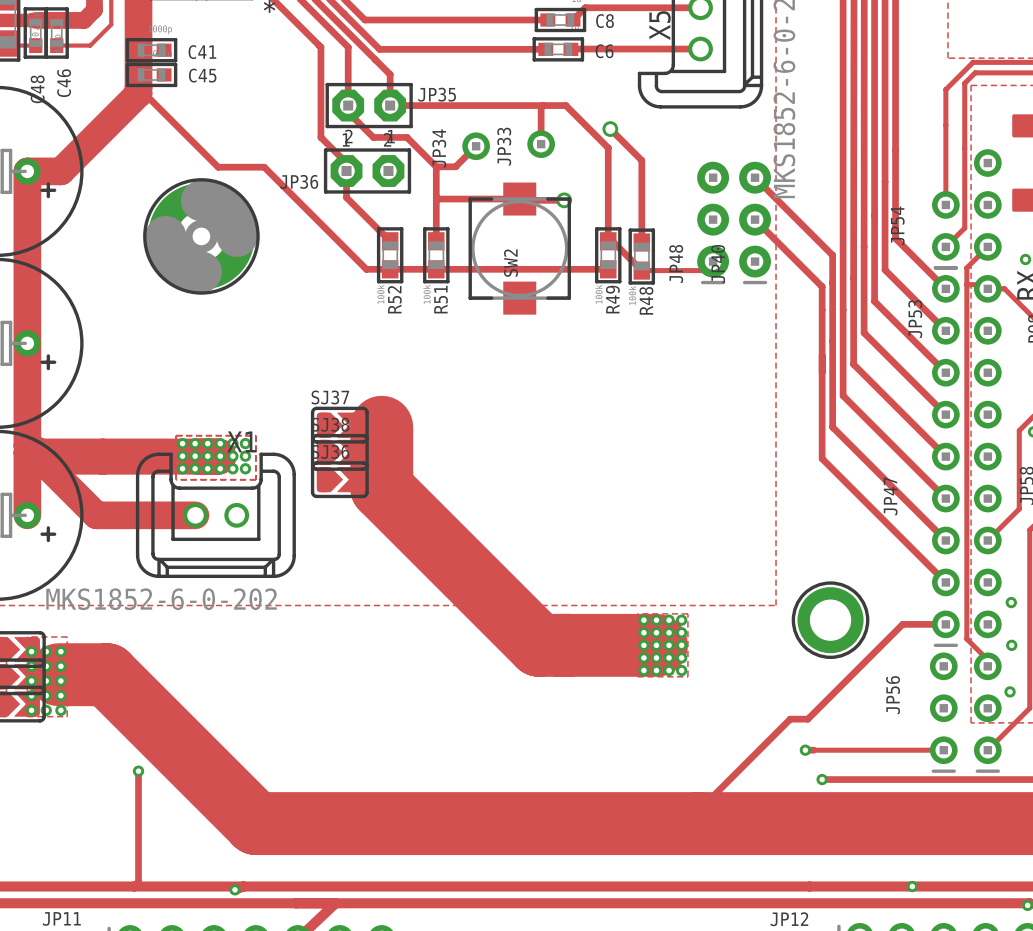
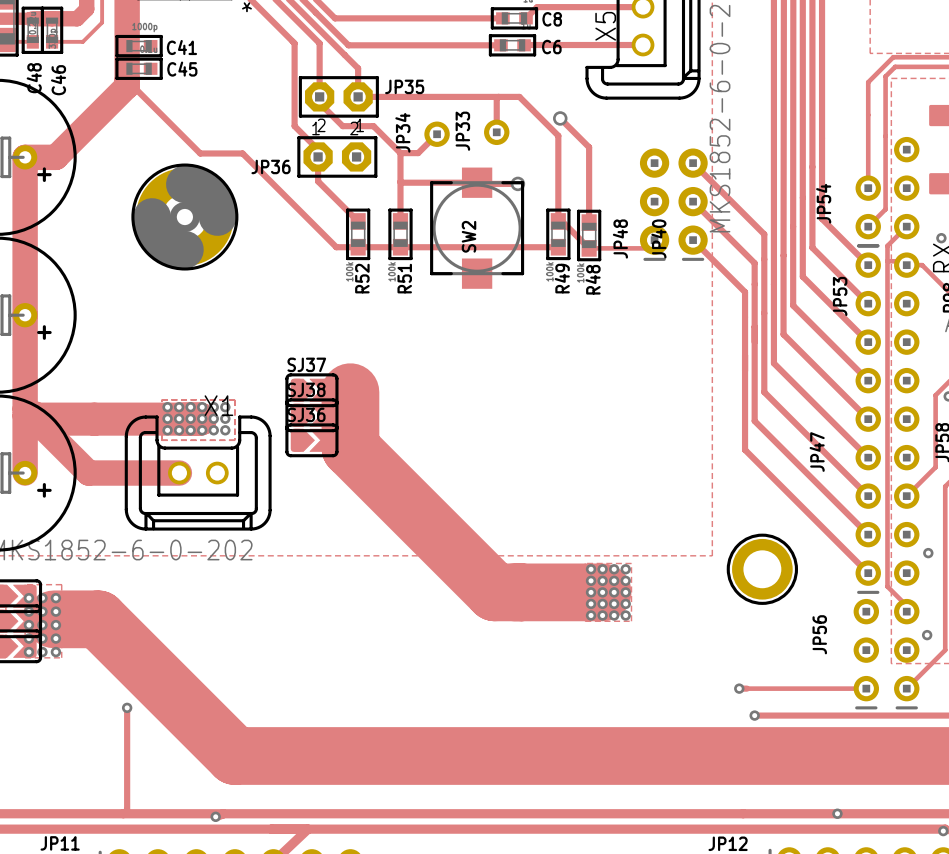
track: (945, 624) (902, 624) (807, 719) (790, 719) (696, 813) (696, 821) (698, 823) -> (868, 573) (745, 449) (745, 292) (693, 240)
via: (1011, 645) -> none

